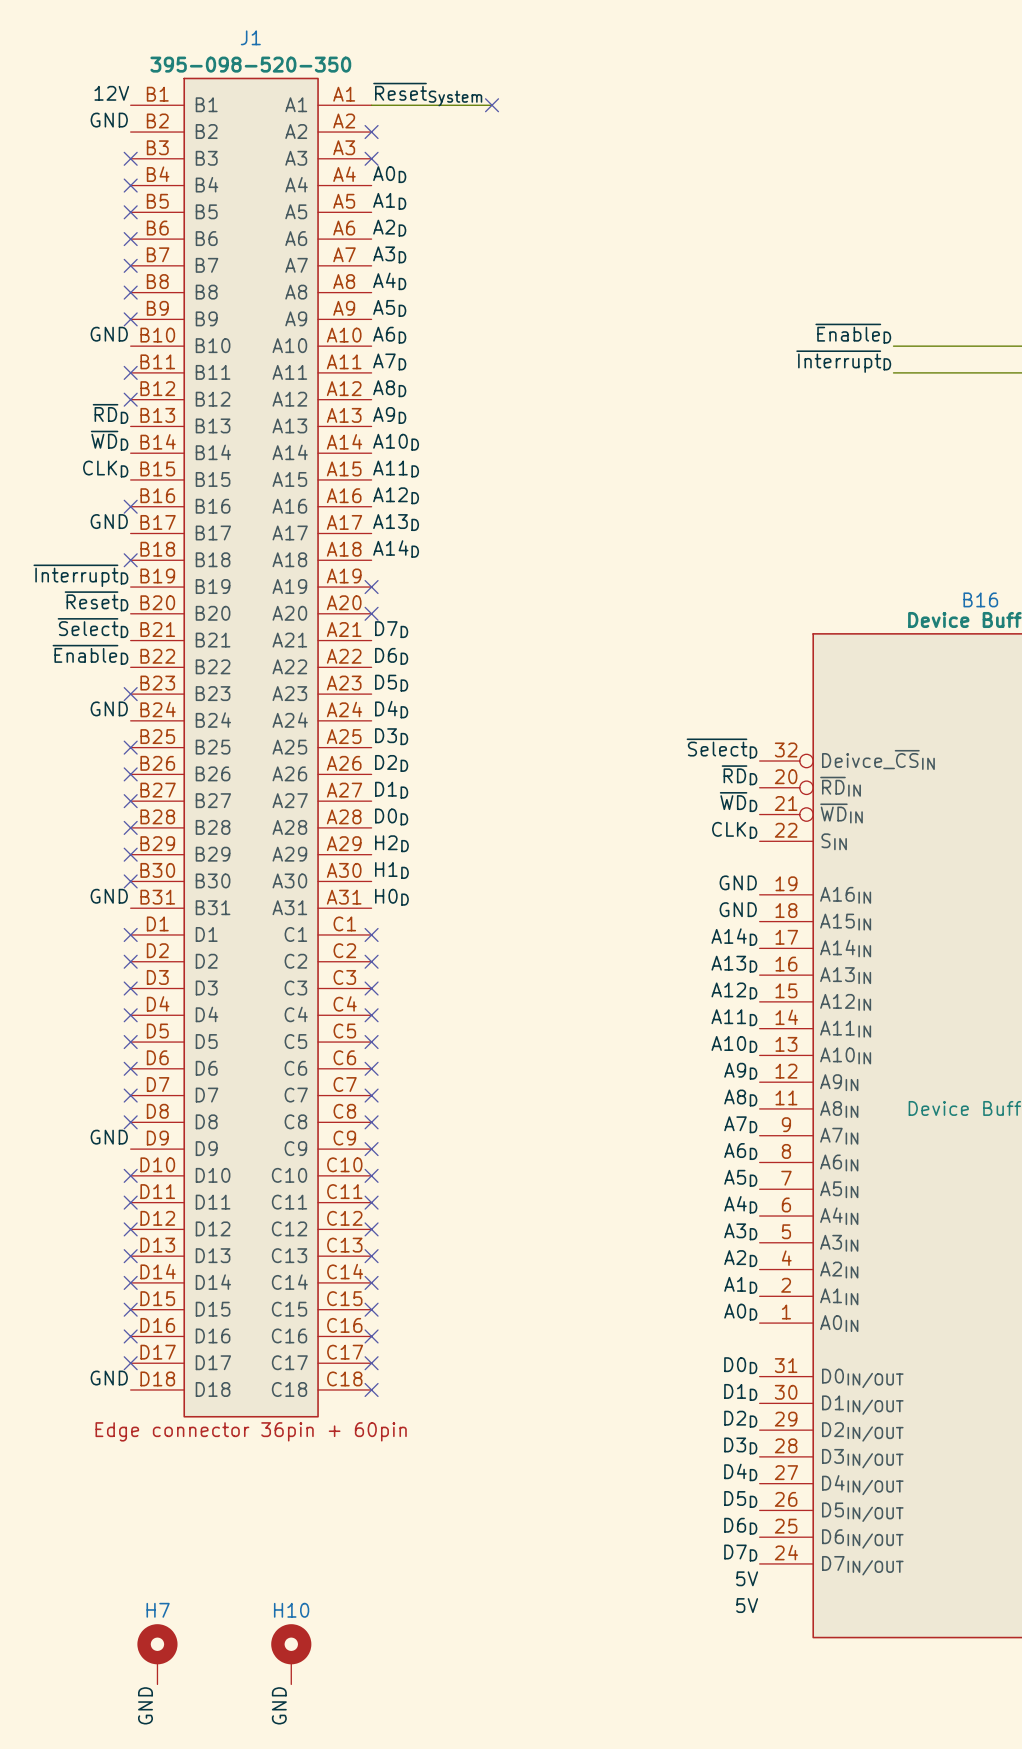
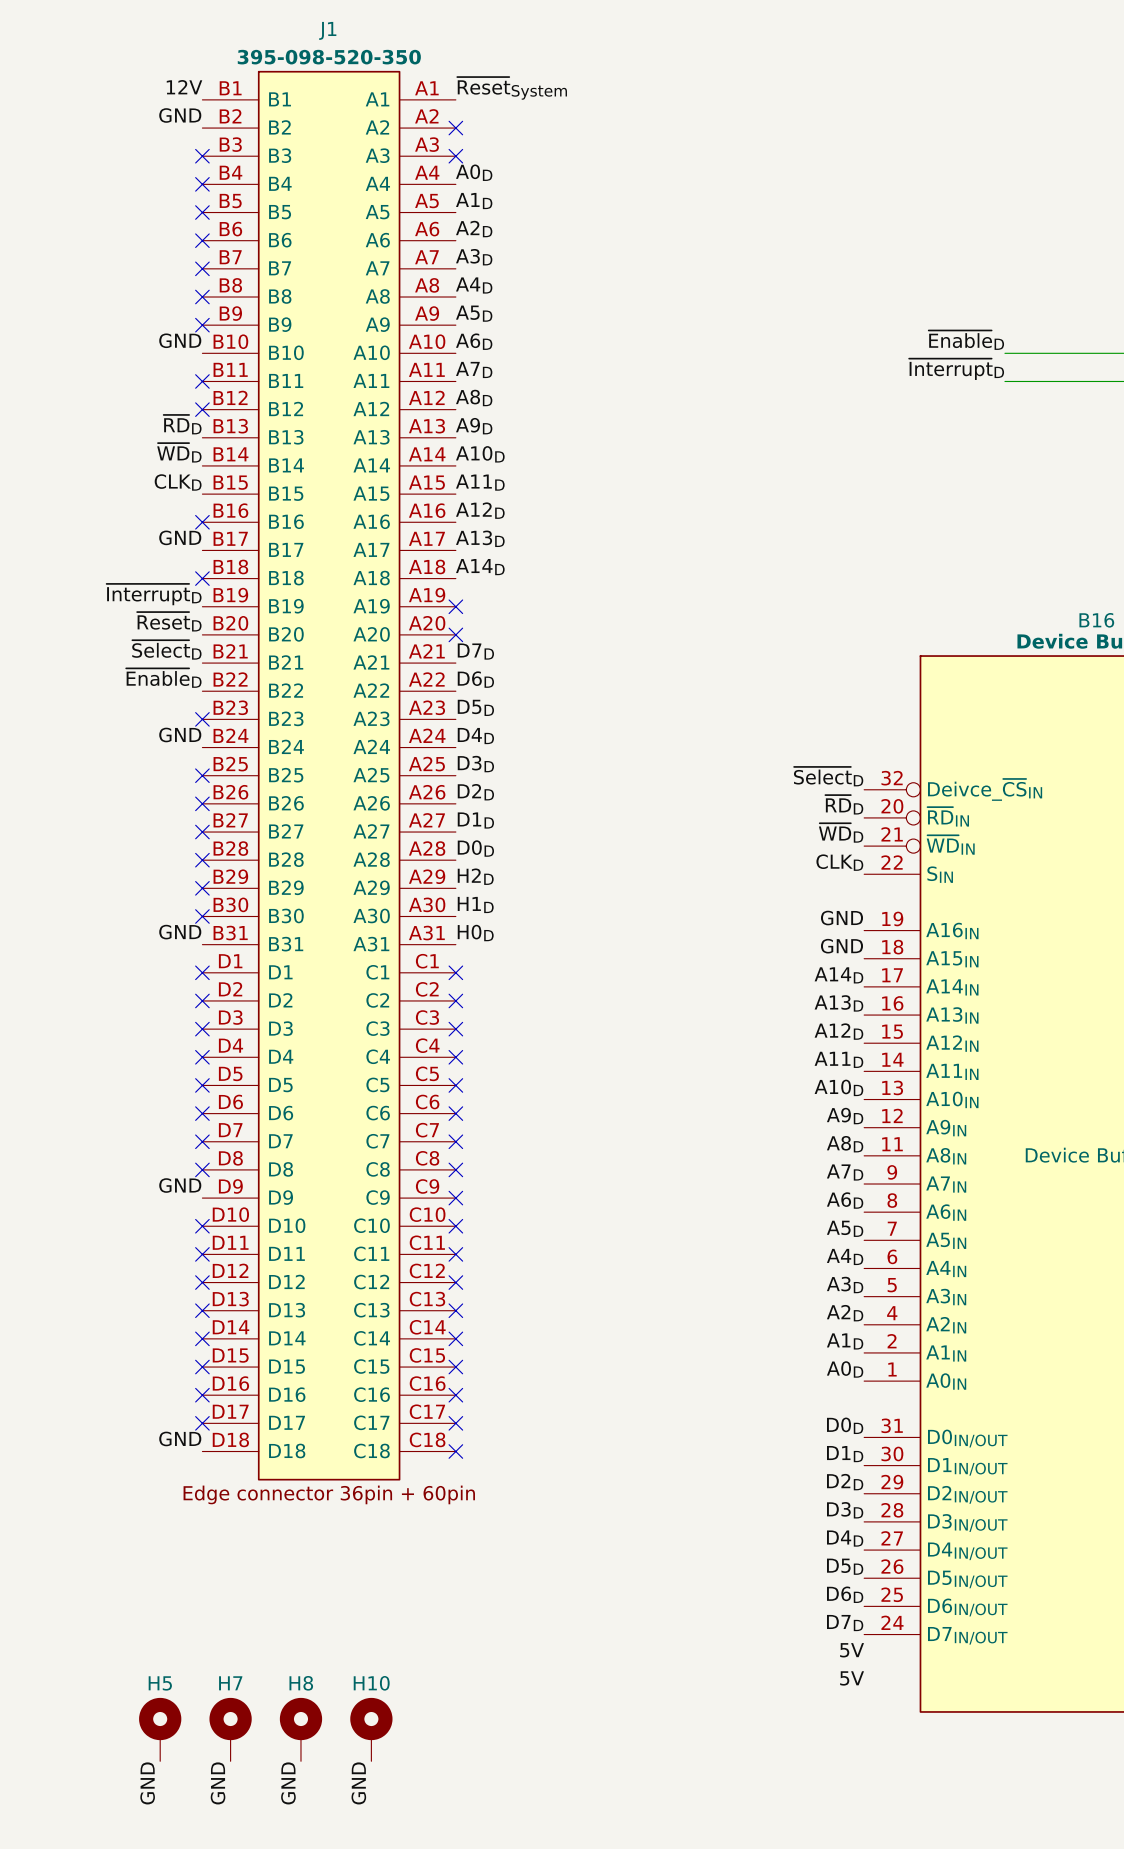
wire: (371, 105) (492, 105) -> none
no-connect mark: (492, 105) -> none
H5: none -> (160, 1729)
H8: none -> (300, 1729)
label: none -> GND (147, 1783)
label: none -> GND (288, 1783)

